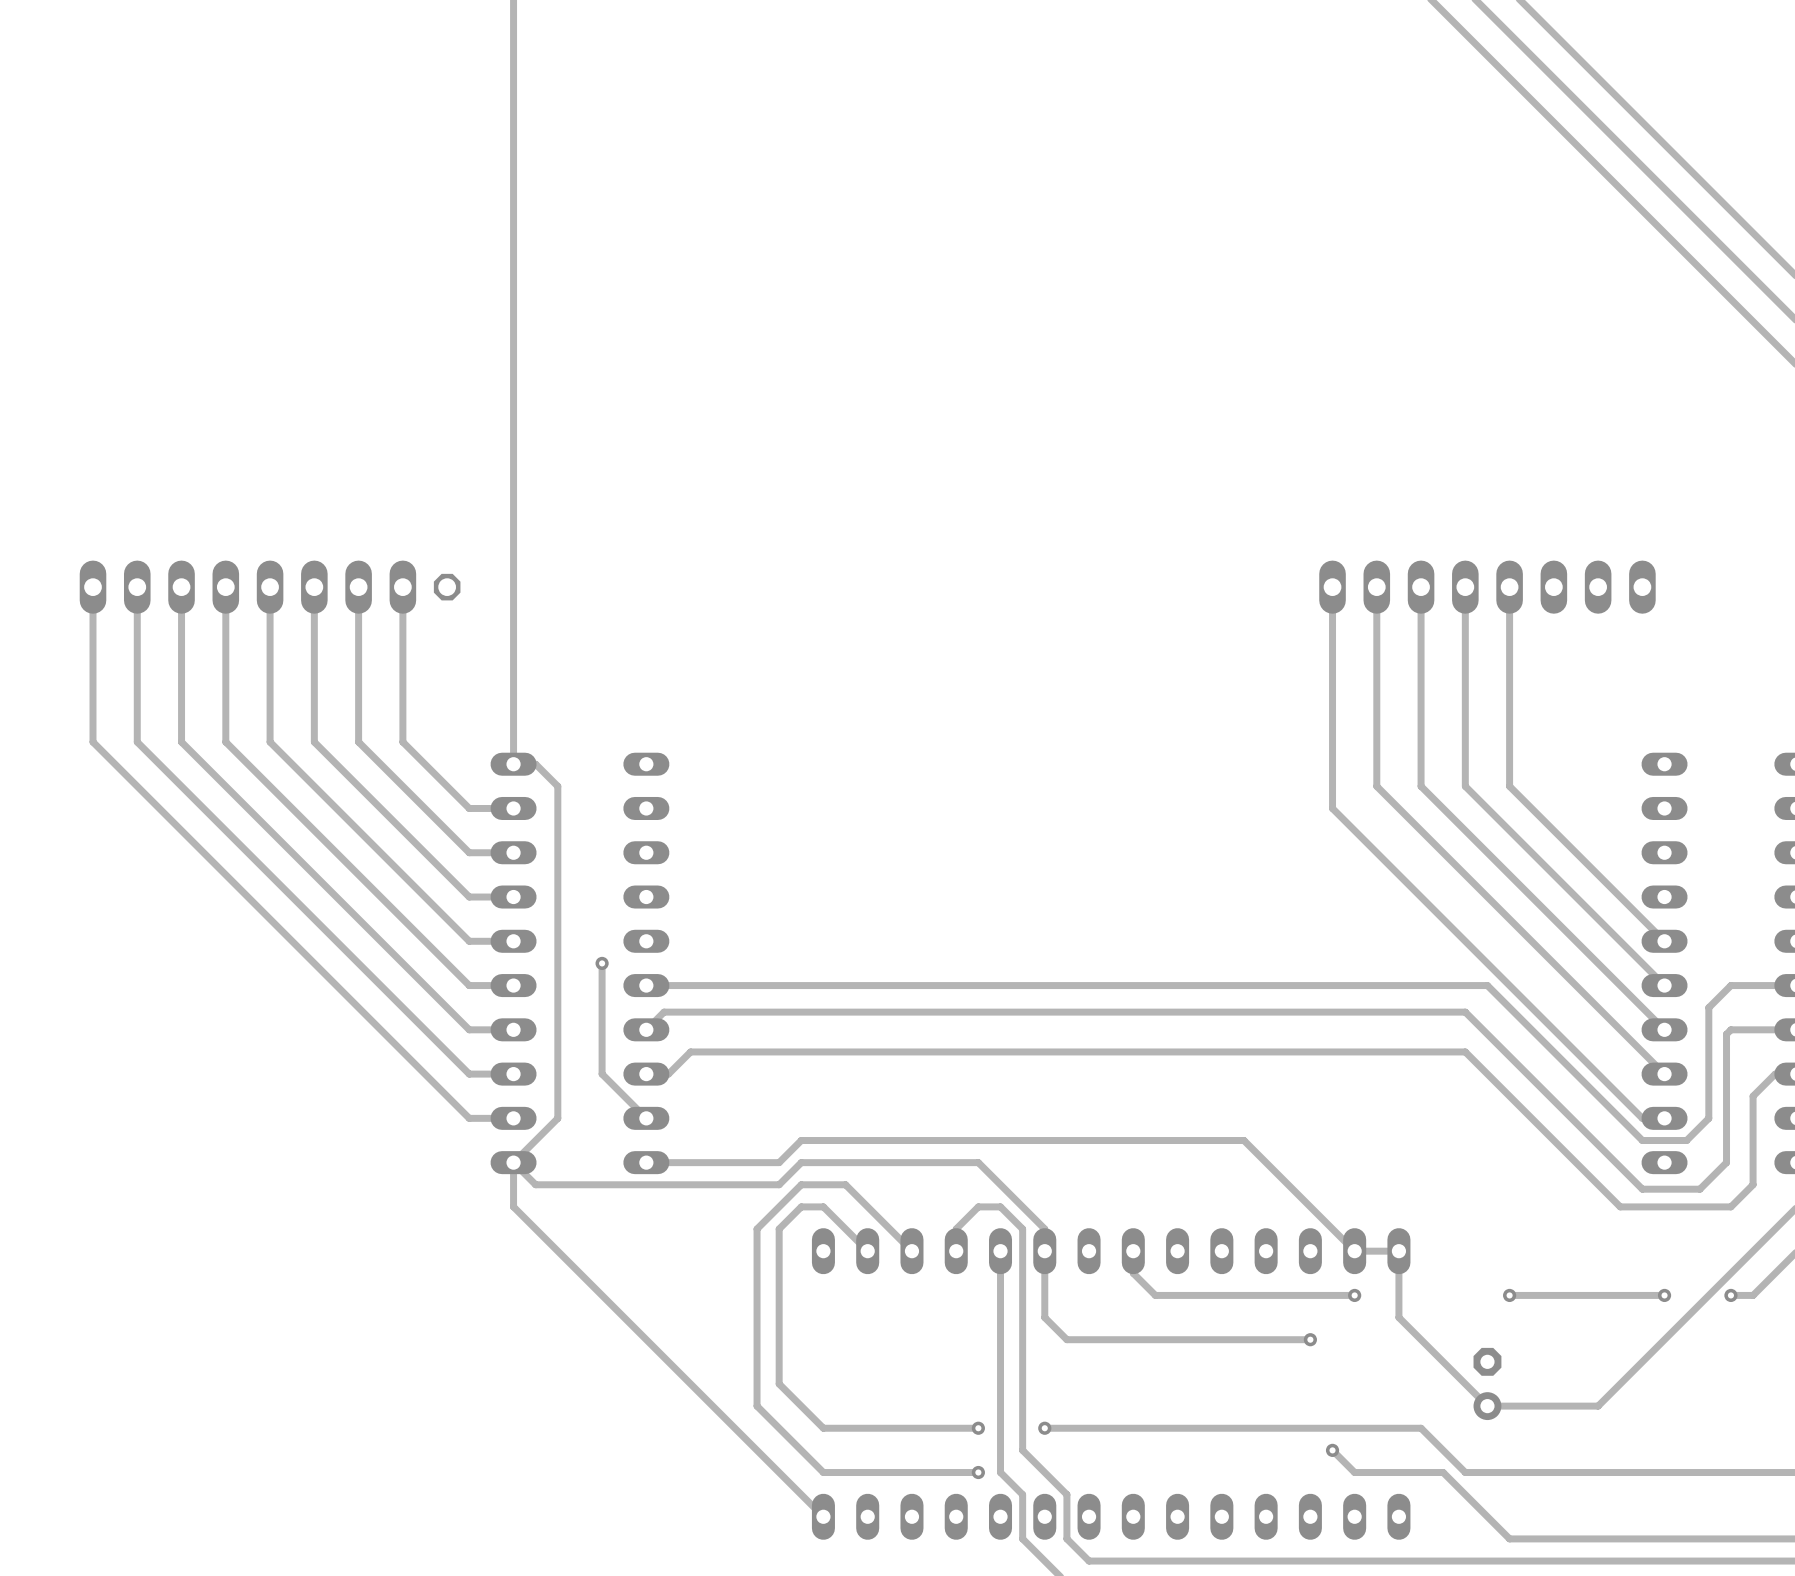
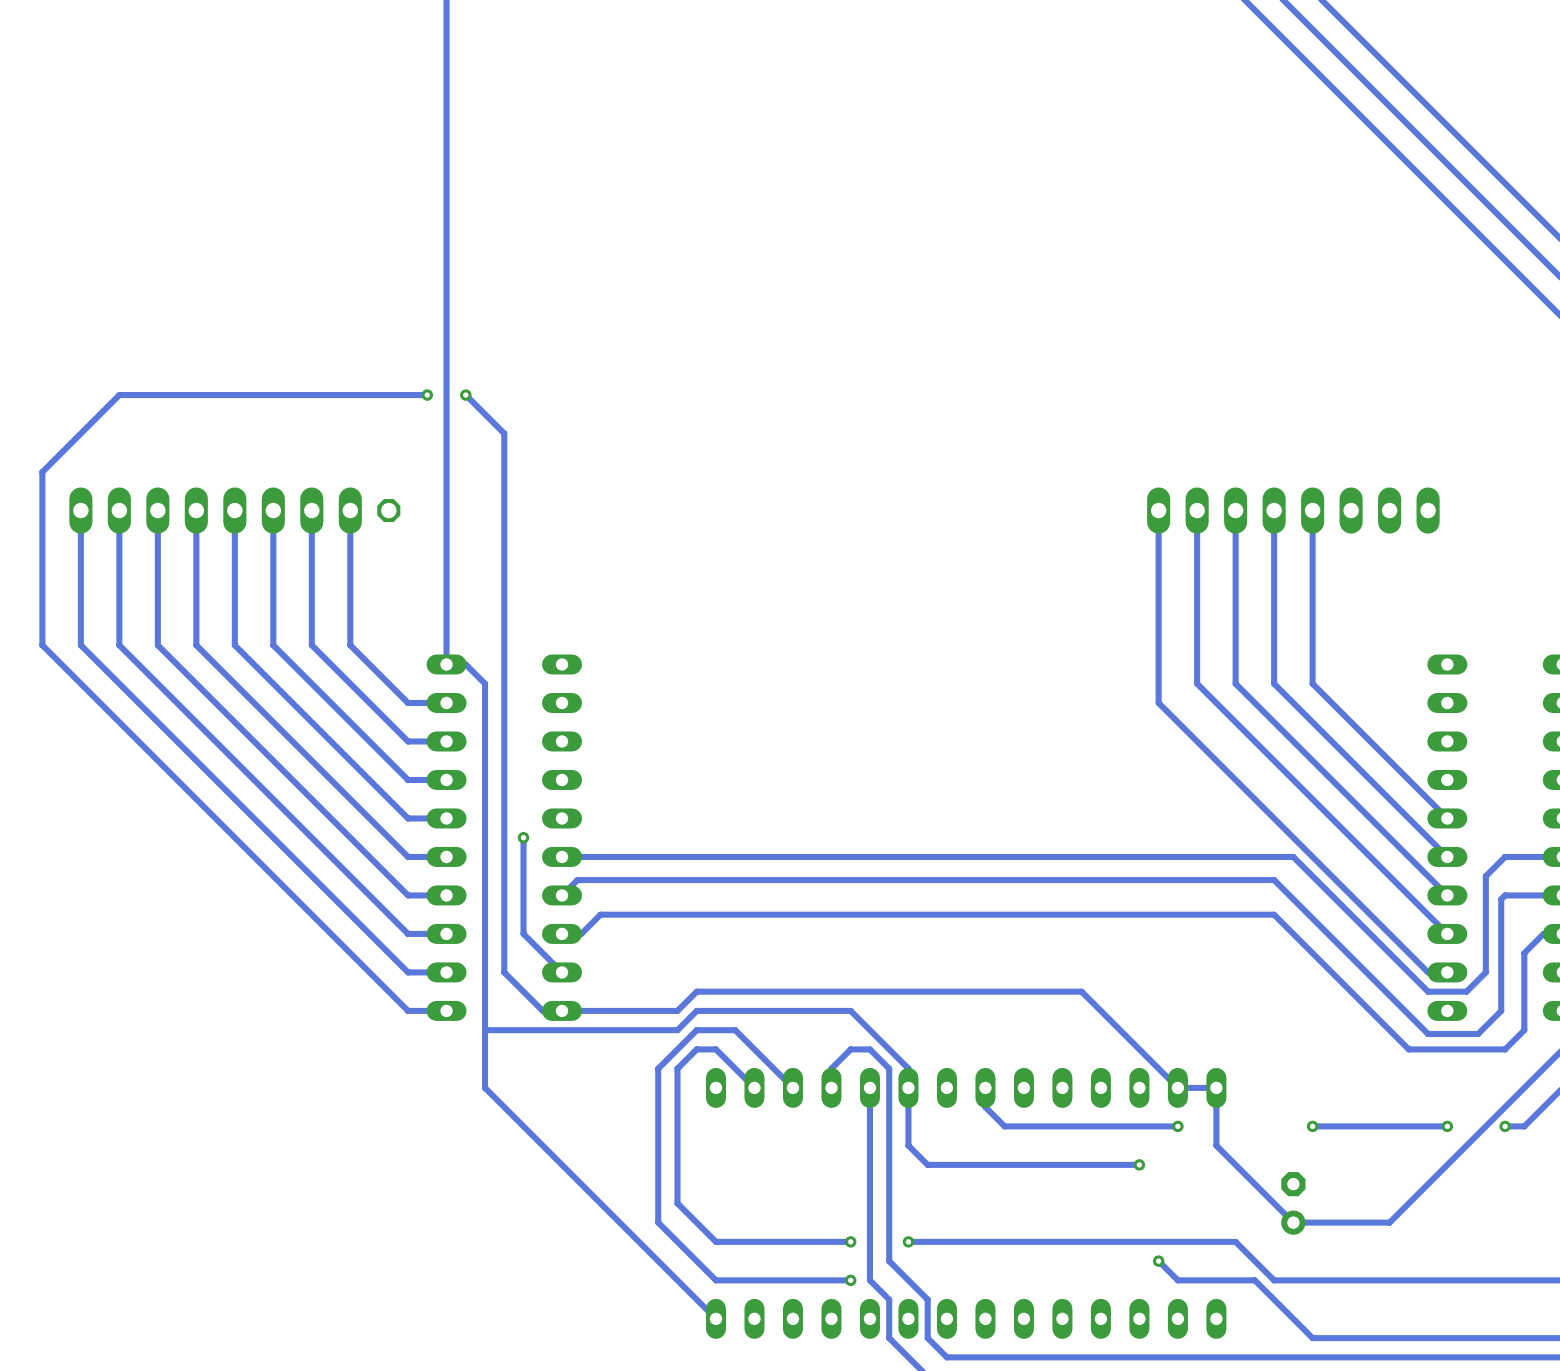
via: none -> (427, 395)
track: none -> (465, 395) (504, 433) (504, 972) (542, 1010) (562, 1010)
via: none -> (465, 395)
track: (557, 1118) (513, 1162) -> (427, 395) (119, 395) (42, 472) (42, 645) (408, 1010) (446, 1010)
track: (513, 1162) (513, 1206) (557, 1251) -> (485, 972) (485, 1087)
track: (513, 1162) (535, 1184) (557, 1184) -> none

